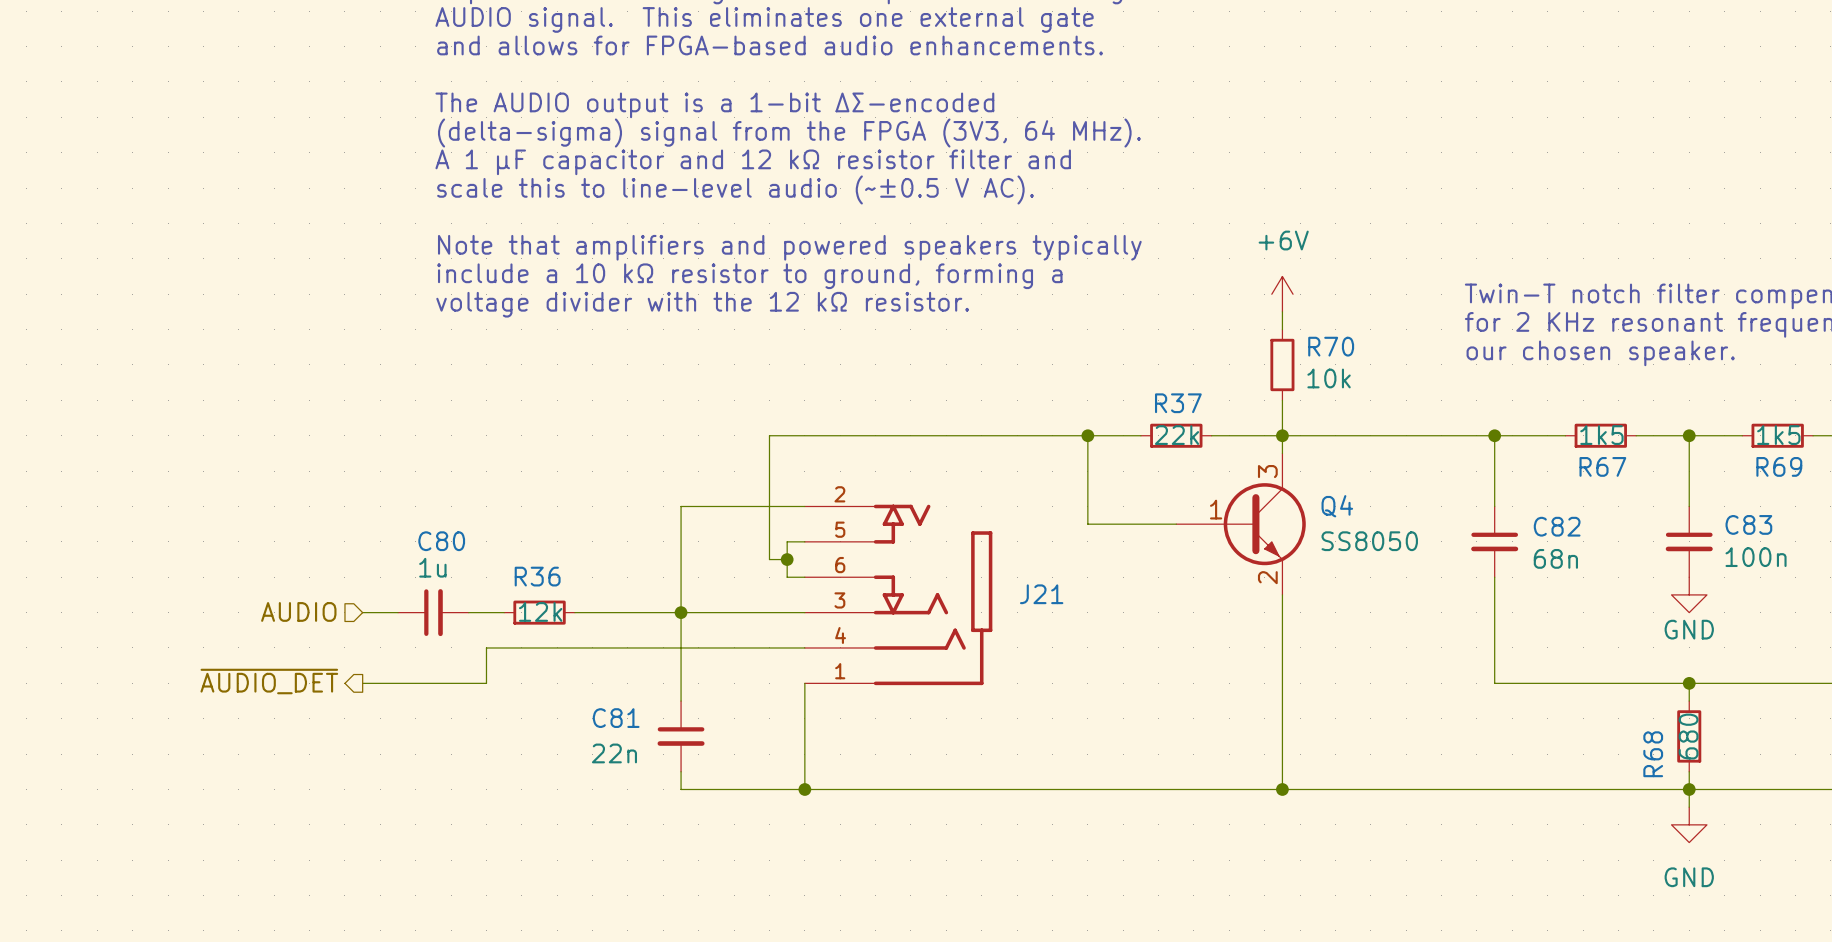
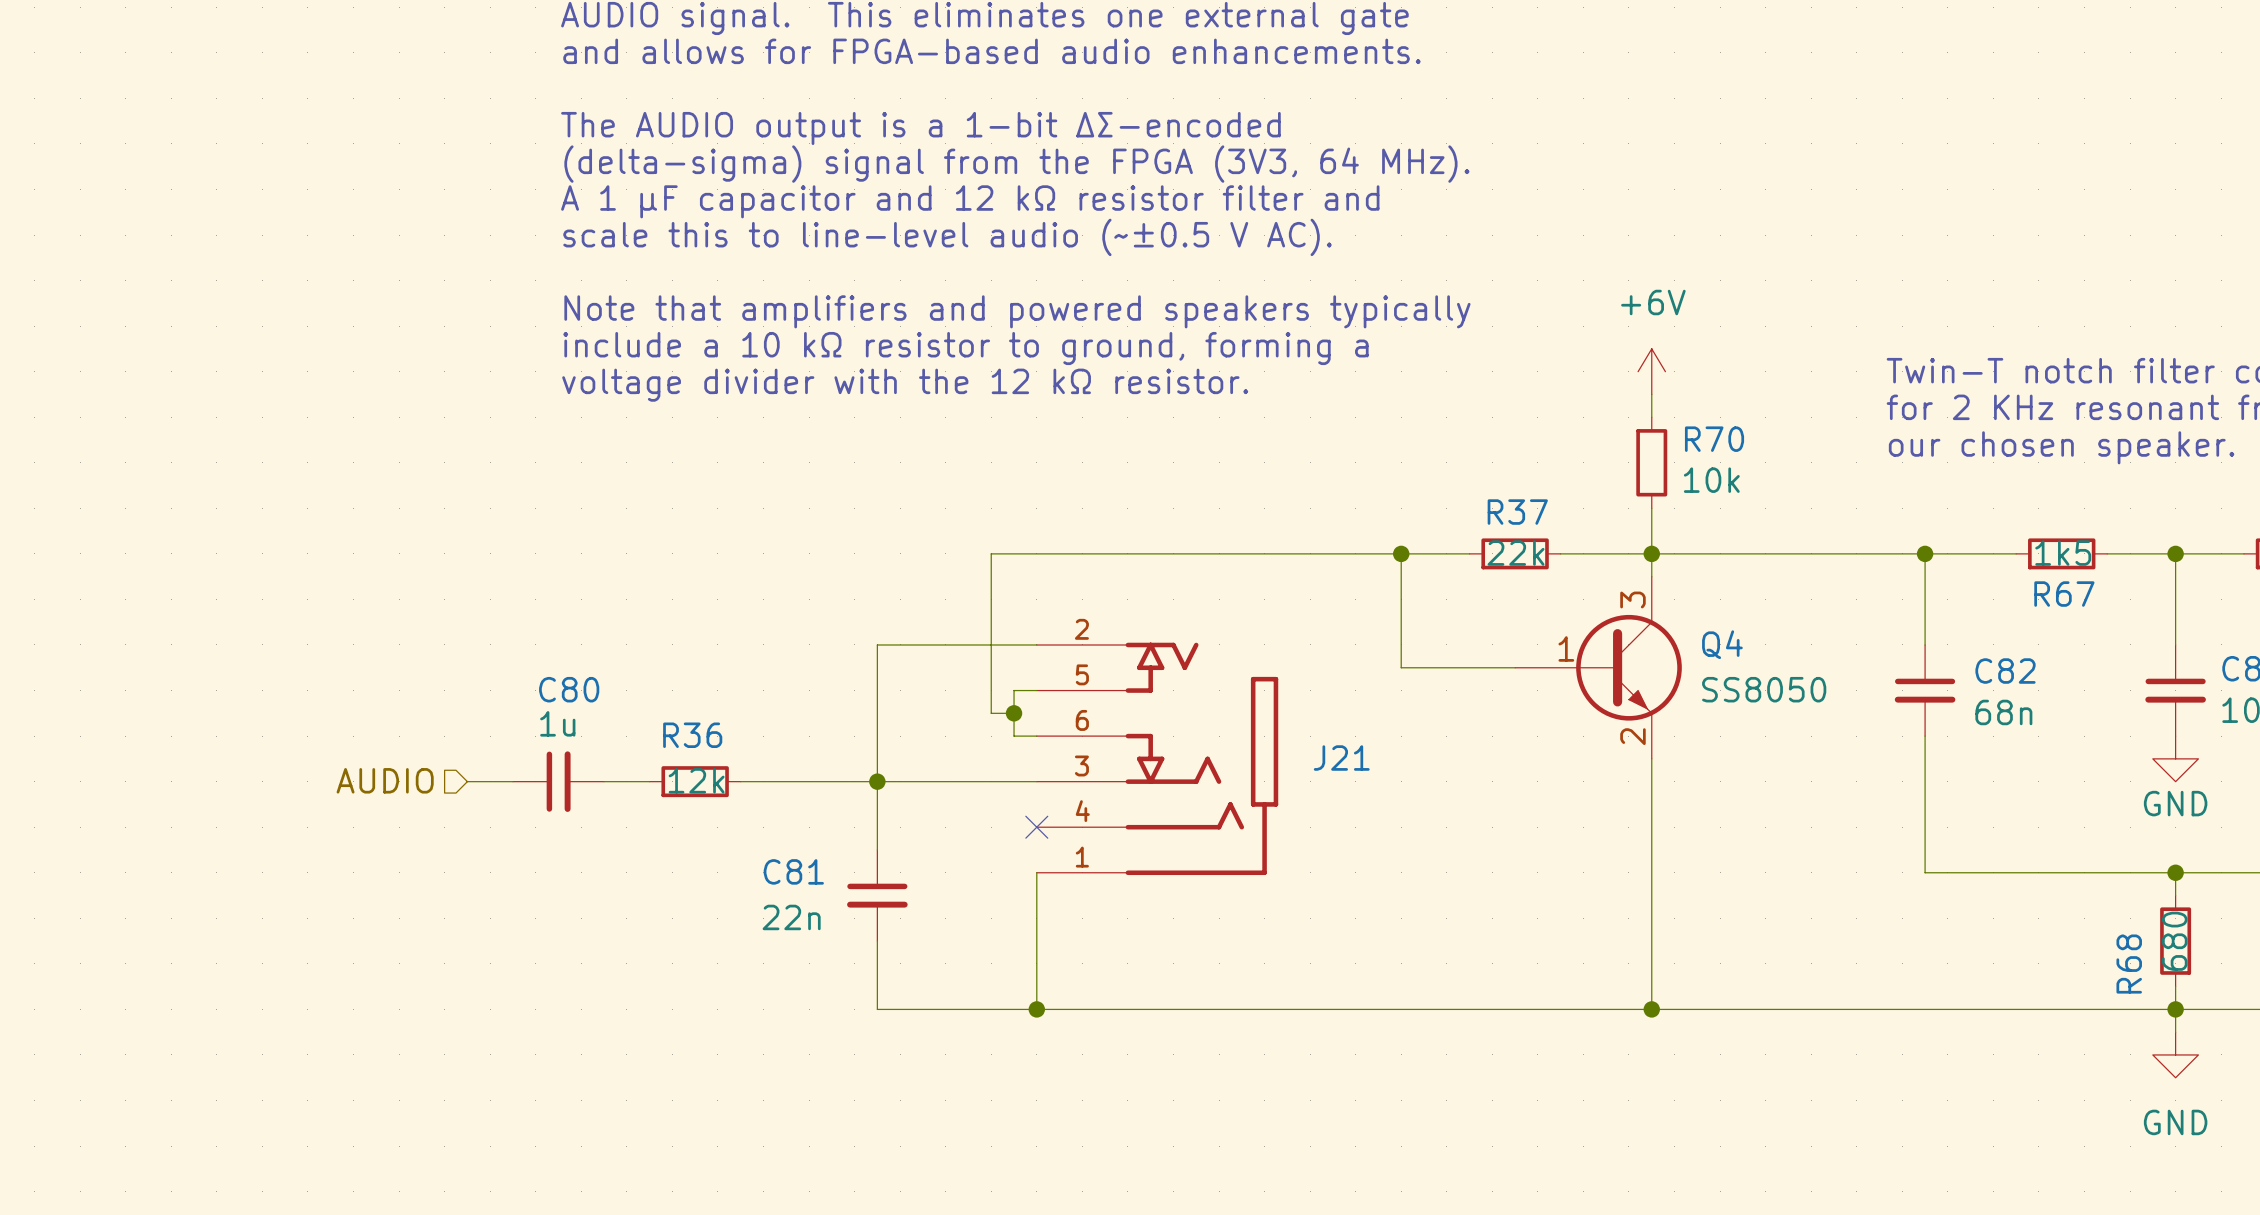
wire: (804, 647) (486, 647) (486, 683) (362, 683) -> none
no-connect mark: none -> (1036, 827)
hierarchical label: ~{AUDIO_DET} (269, 681) -> none
C81 position: (681, 736) -> (877, 895)

